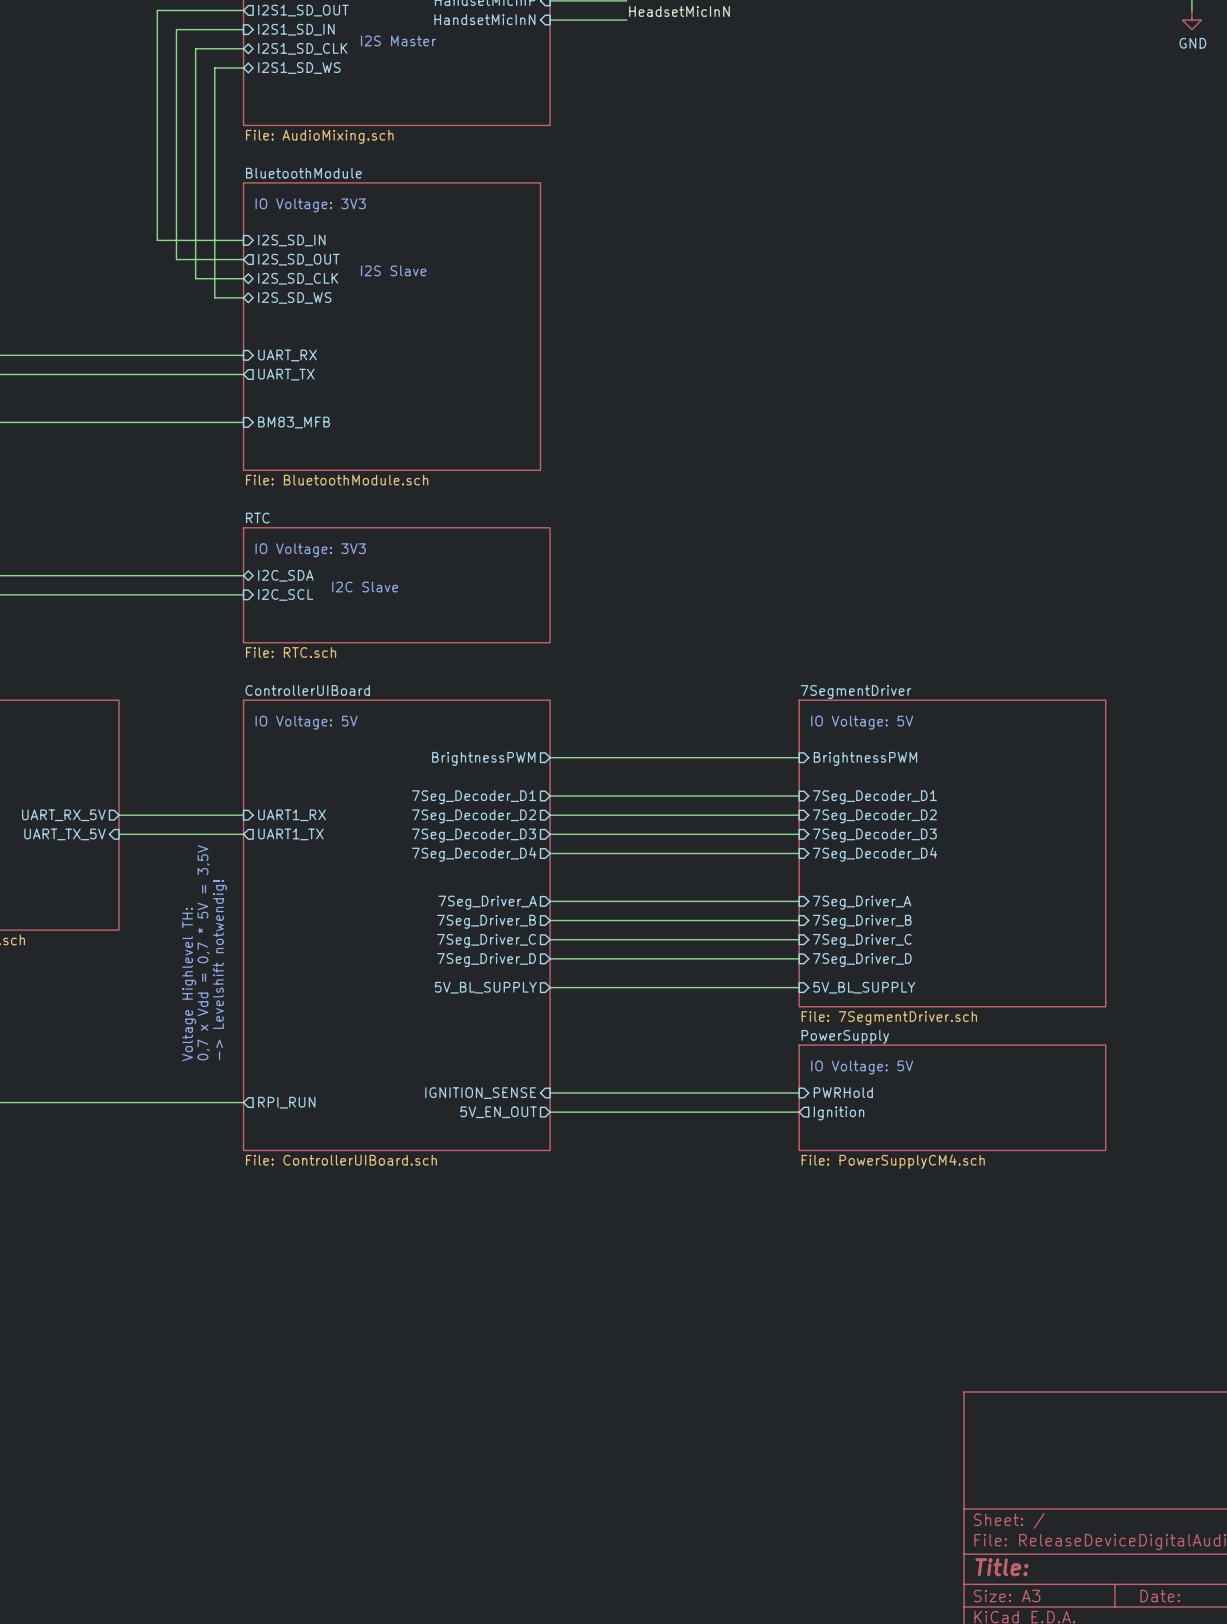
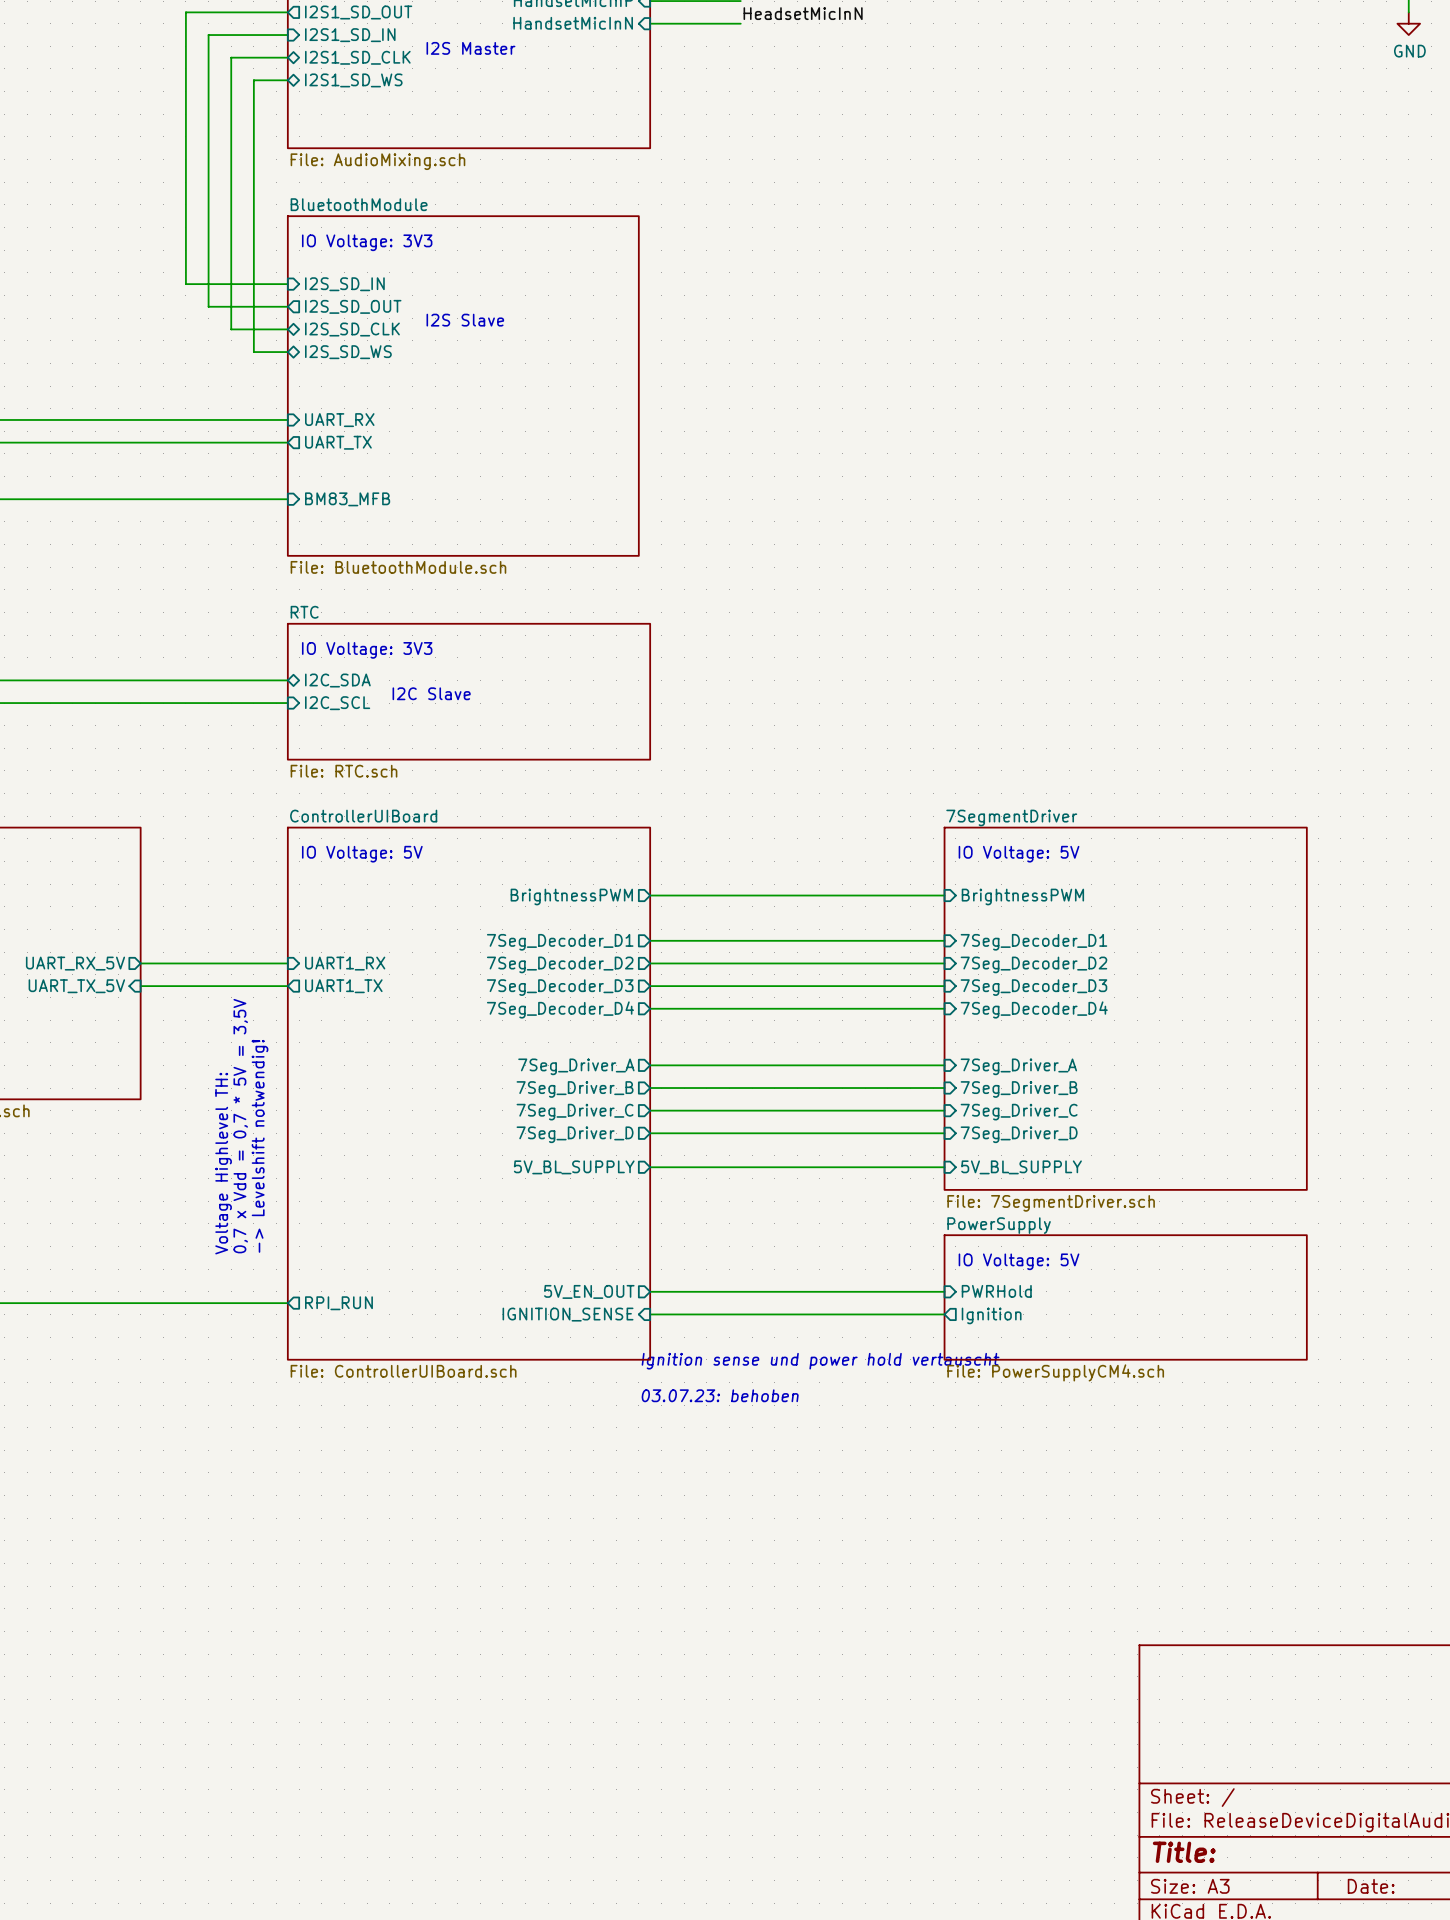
sheet pin shape: input (480, 1093) -> output (589, 1291)
sheet pin: IGNITION_SENSE (480, 1093) -> 5V_EN_OUT (589, 1291)
sheet pin shape: output (498, 1112) -> input (568, 1314)
sheet pin: 5V_EN_OUT (498, 1112) -> IGNITION_SENSE (568, 1314)
text: none -> Ignition sense und power hold vertauscht (820, 1361)
text: none -> 03.07.23: behoben (720, 1395)

